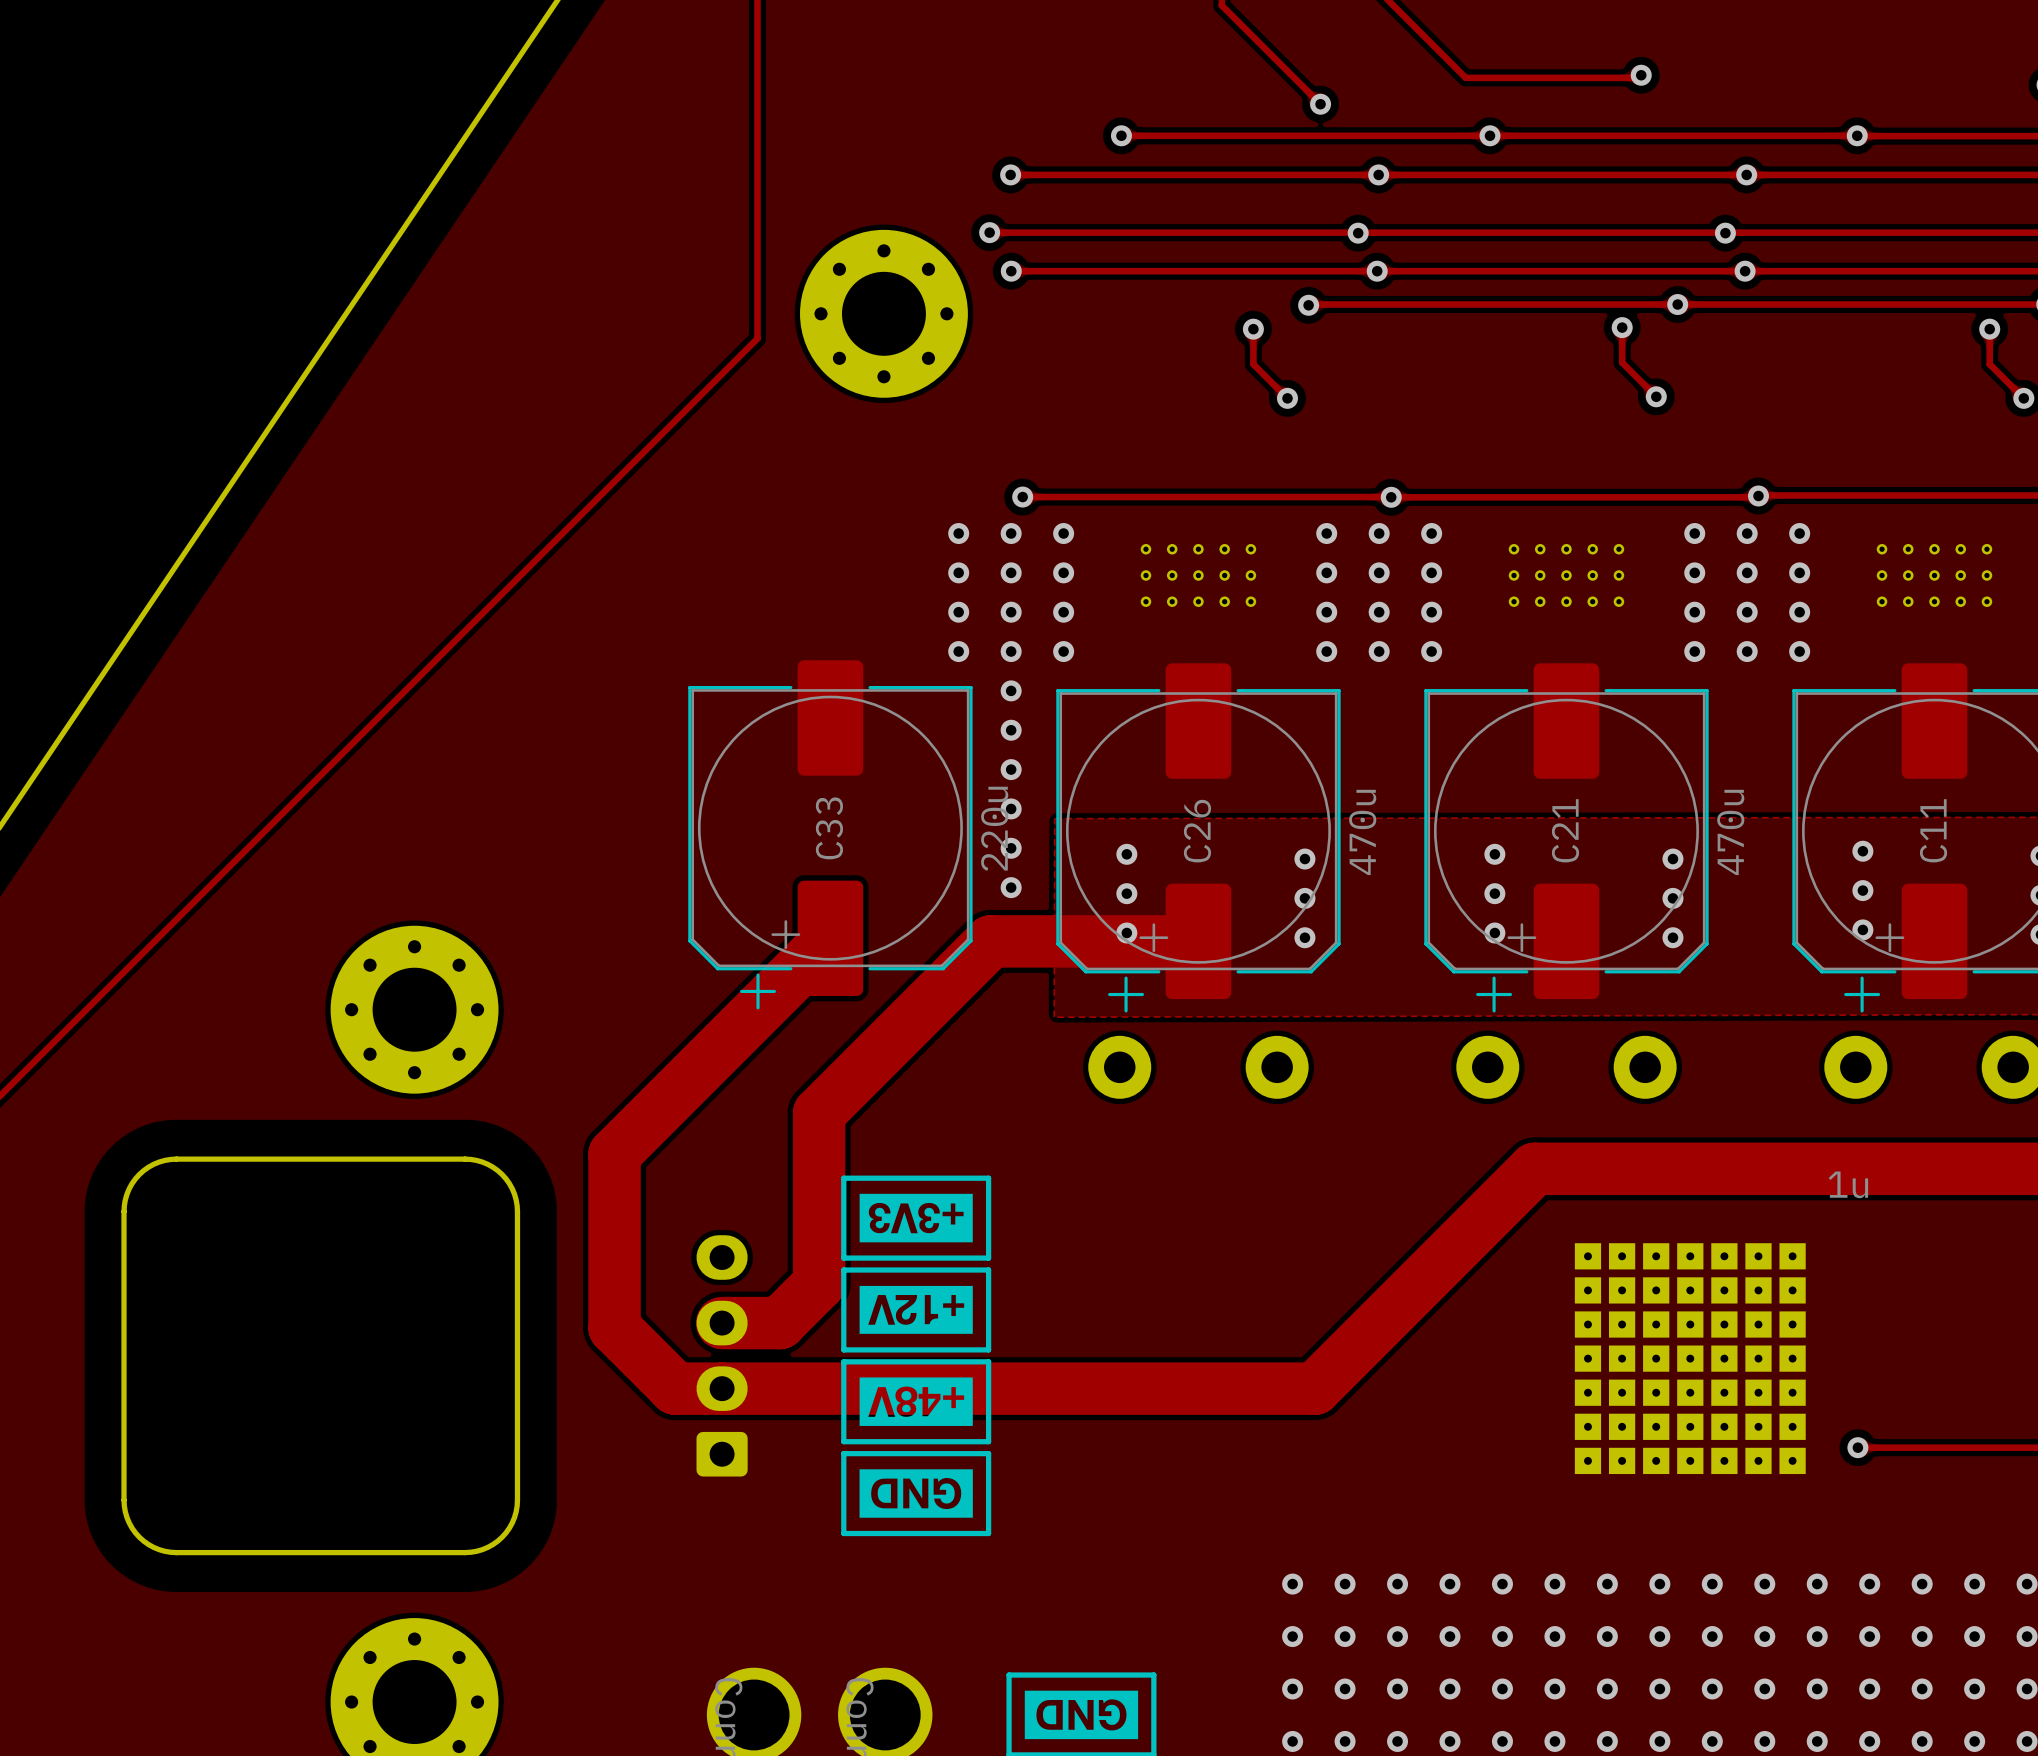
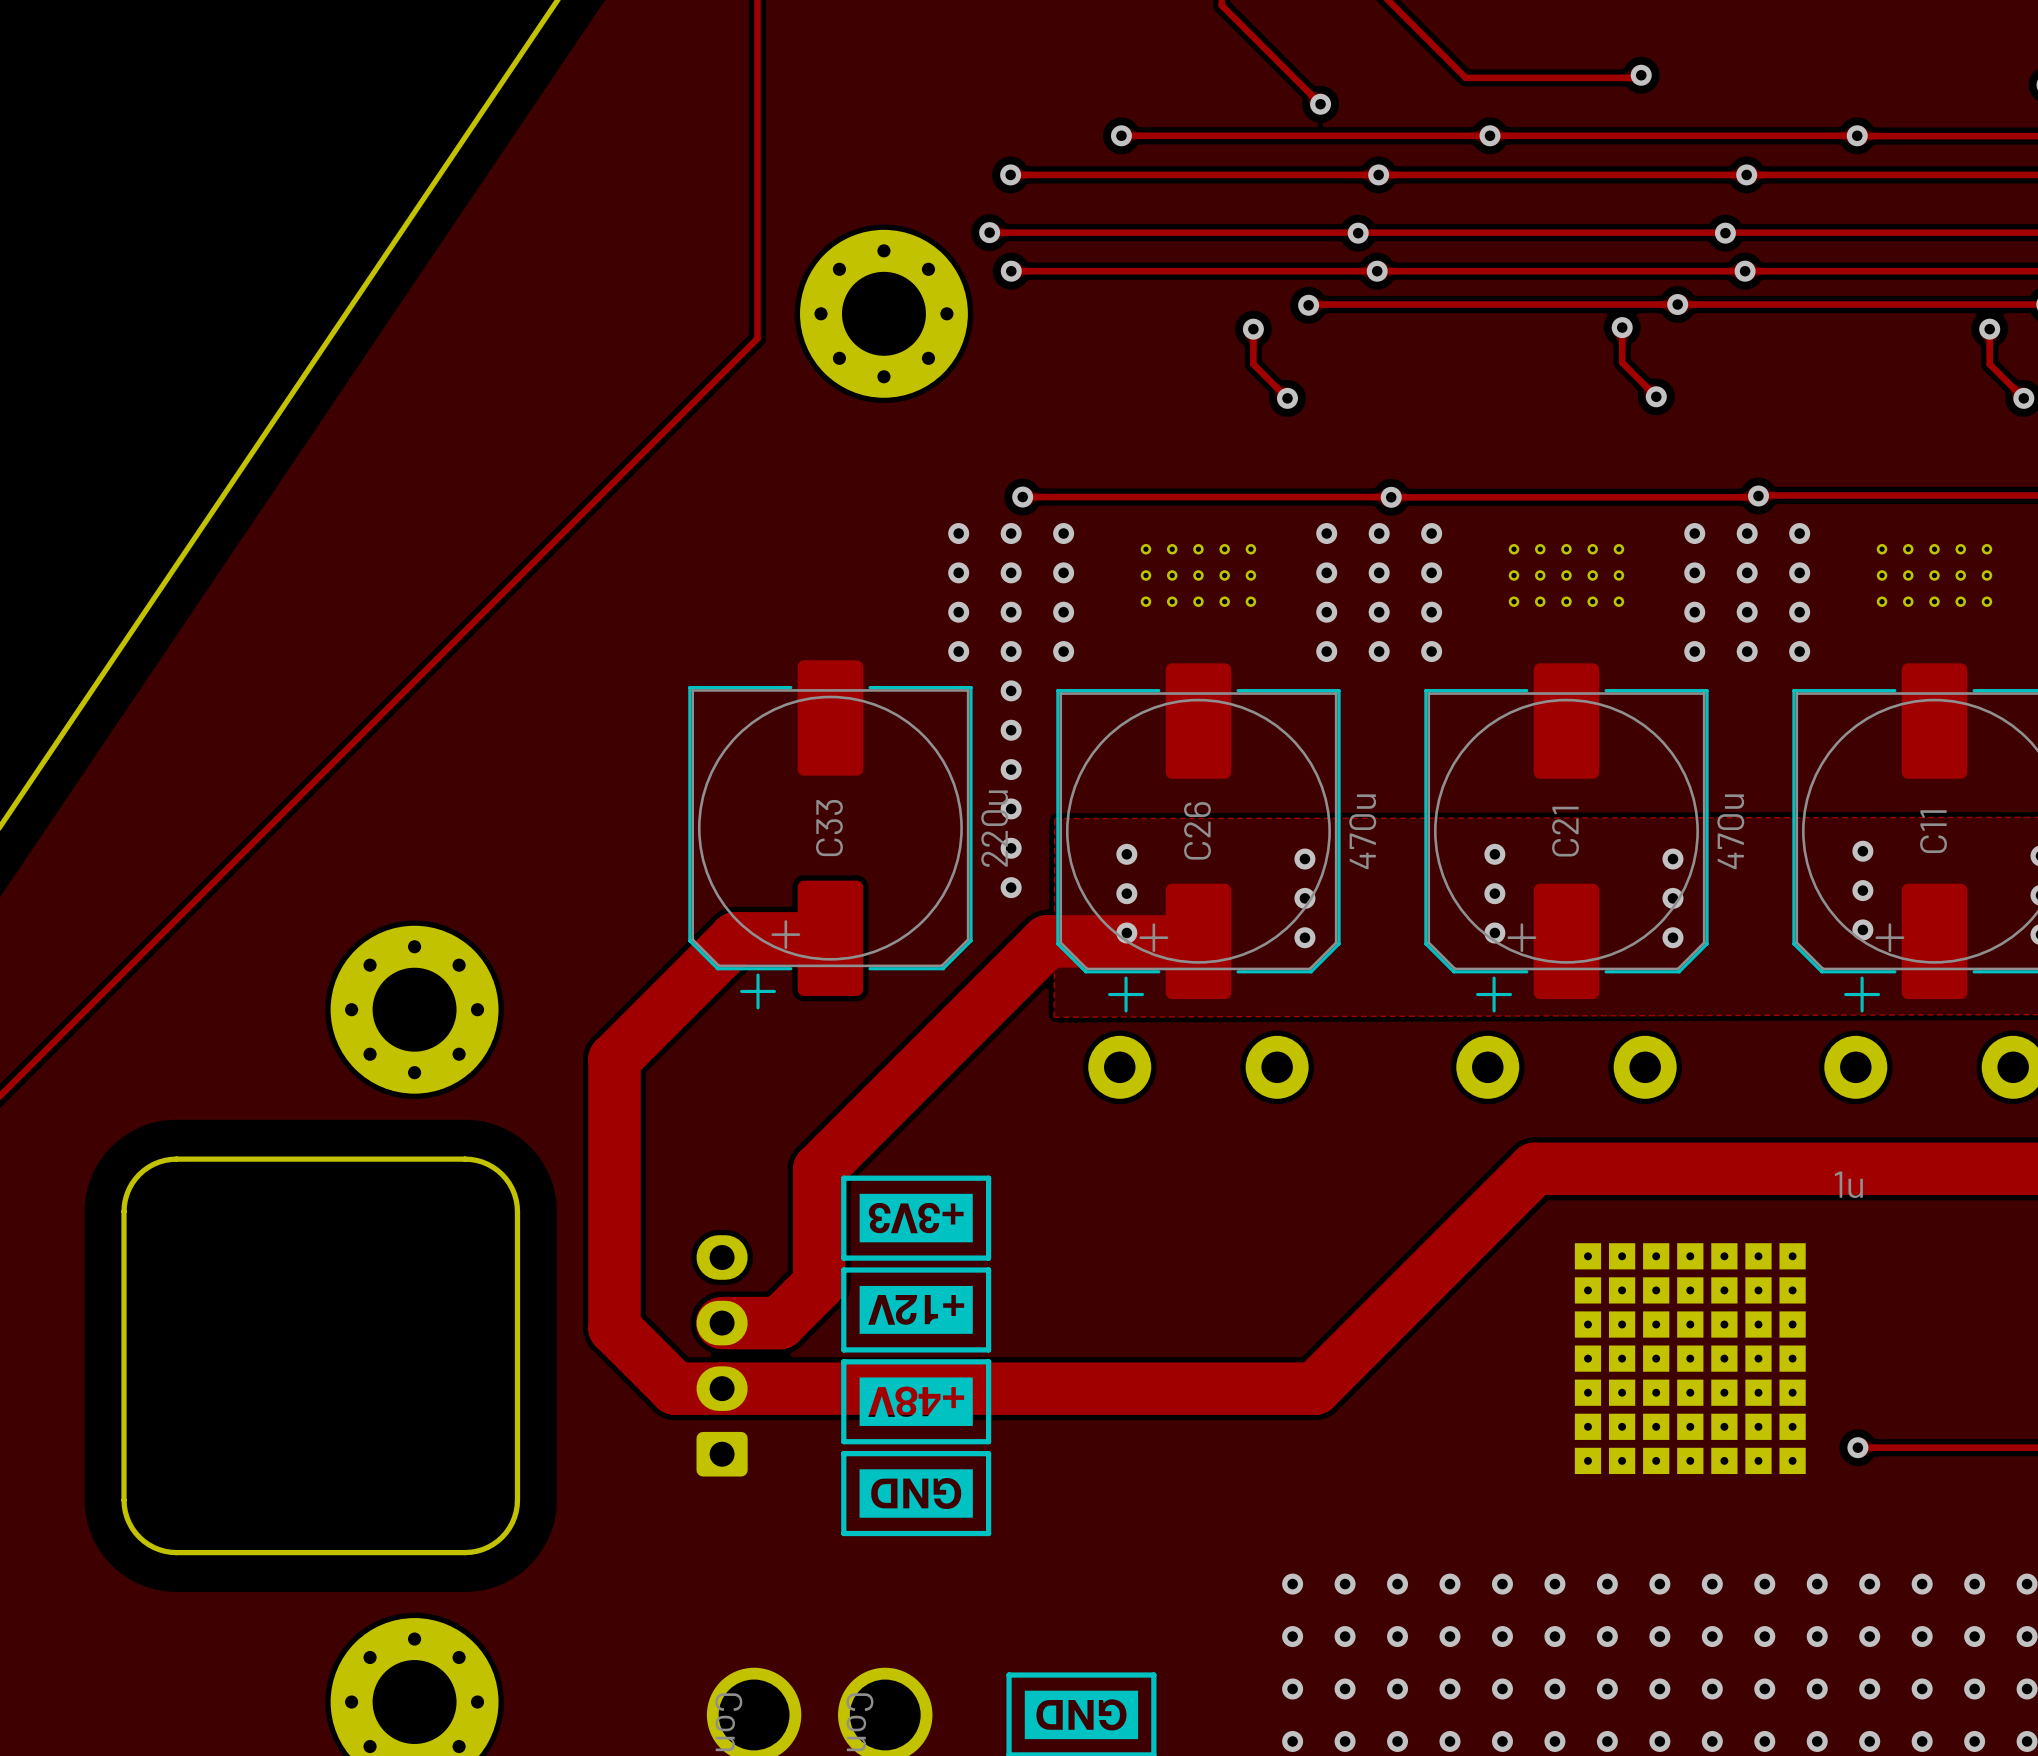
track: (830, 938) (614, 1154) -> (830, 938) (735, 938) (614, 1059) (614, 1154)
track: (1047, 941) (990, 941) (819, 1113) (819, 1169) -> (1047, 941) (819, 1169)

